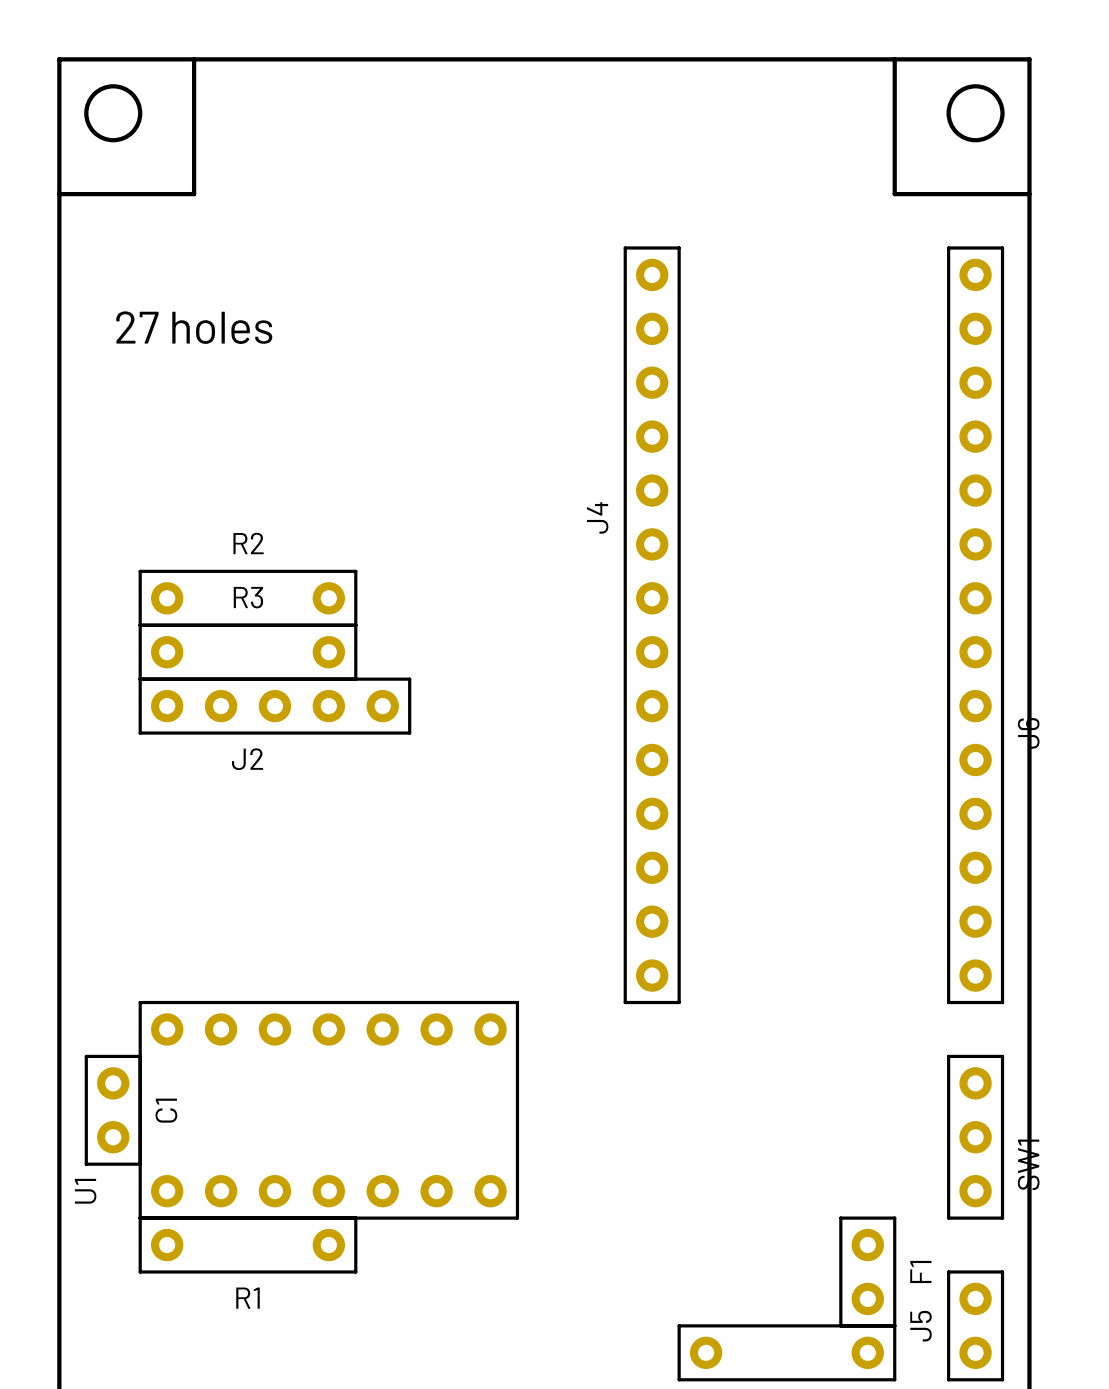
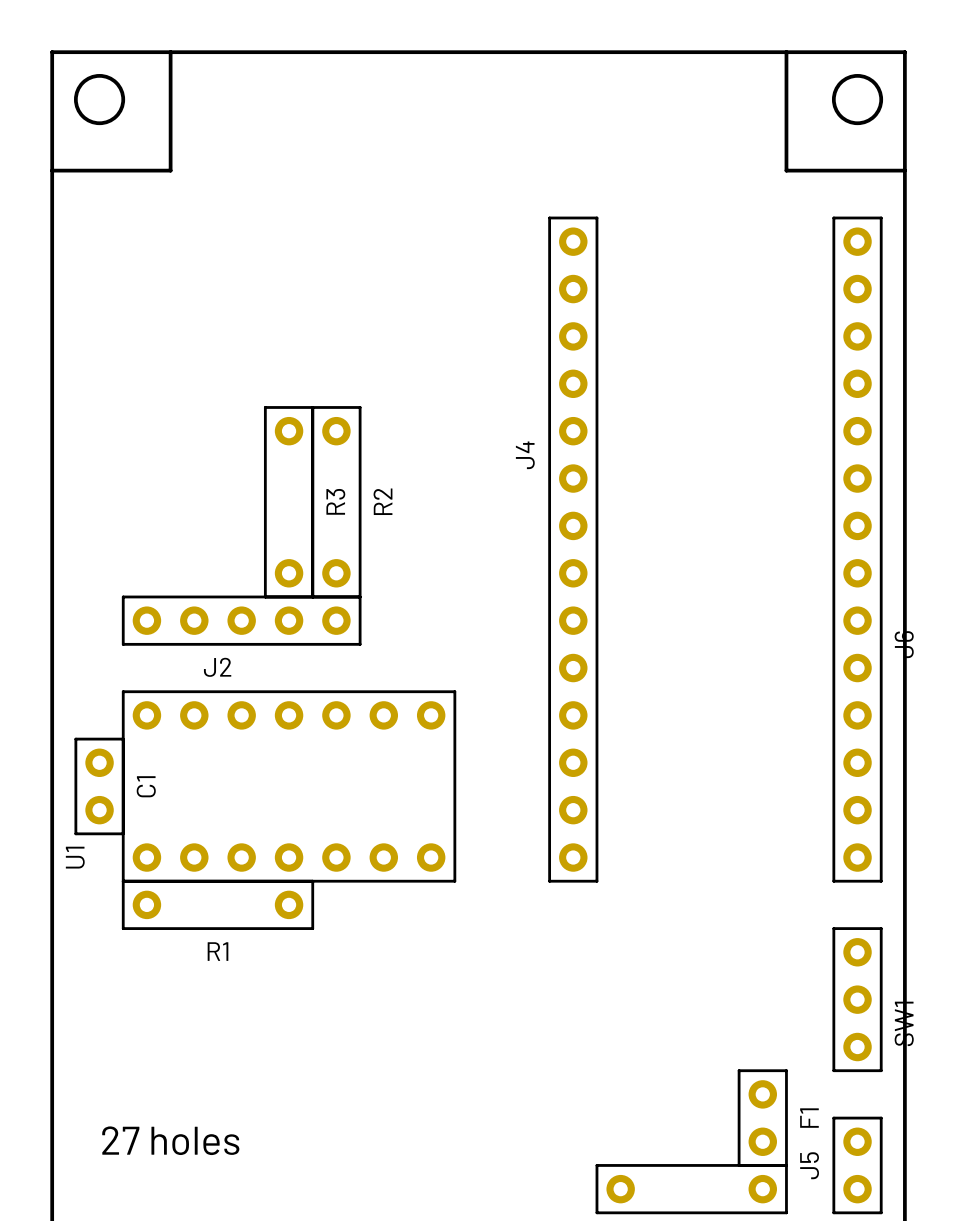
text: 27 holes (194, 327) -> none
R2 rotation: 0° (247, 598) -> 90° clockwise (336, 502)
R2 position: (247, 598) -> (336, 502)
R3 rotation: 0° (247, 652) -> 90° clockwise (289, 502)
C1 position: (113, 1110) -> (99, 786)
U1 position: (328, 1110) -> (289, 786)
R1 position: (247, 1245) -> (217, 904)
text: none -> 27 holes (170, 1140)

